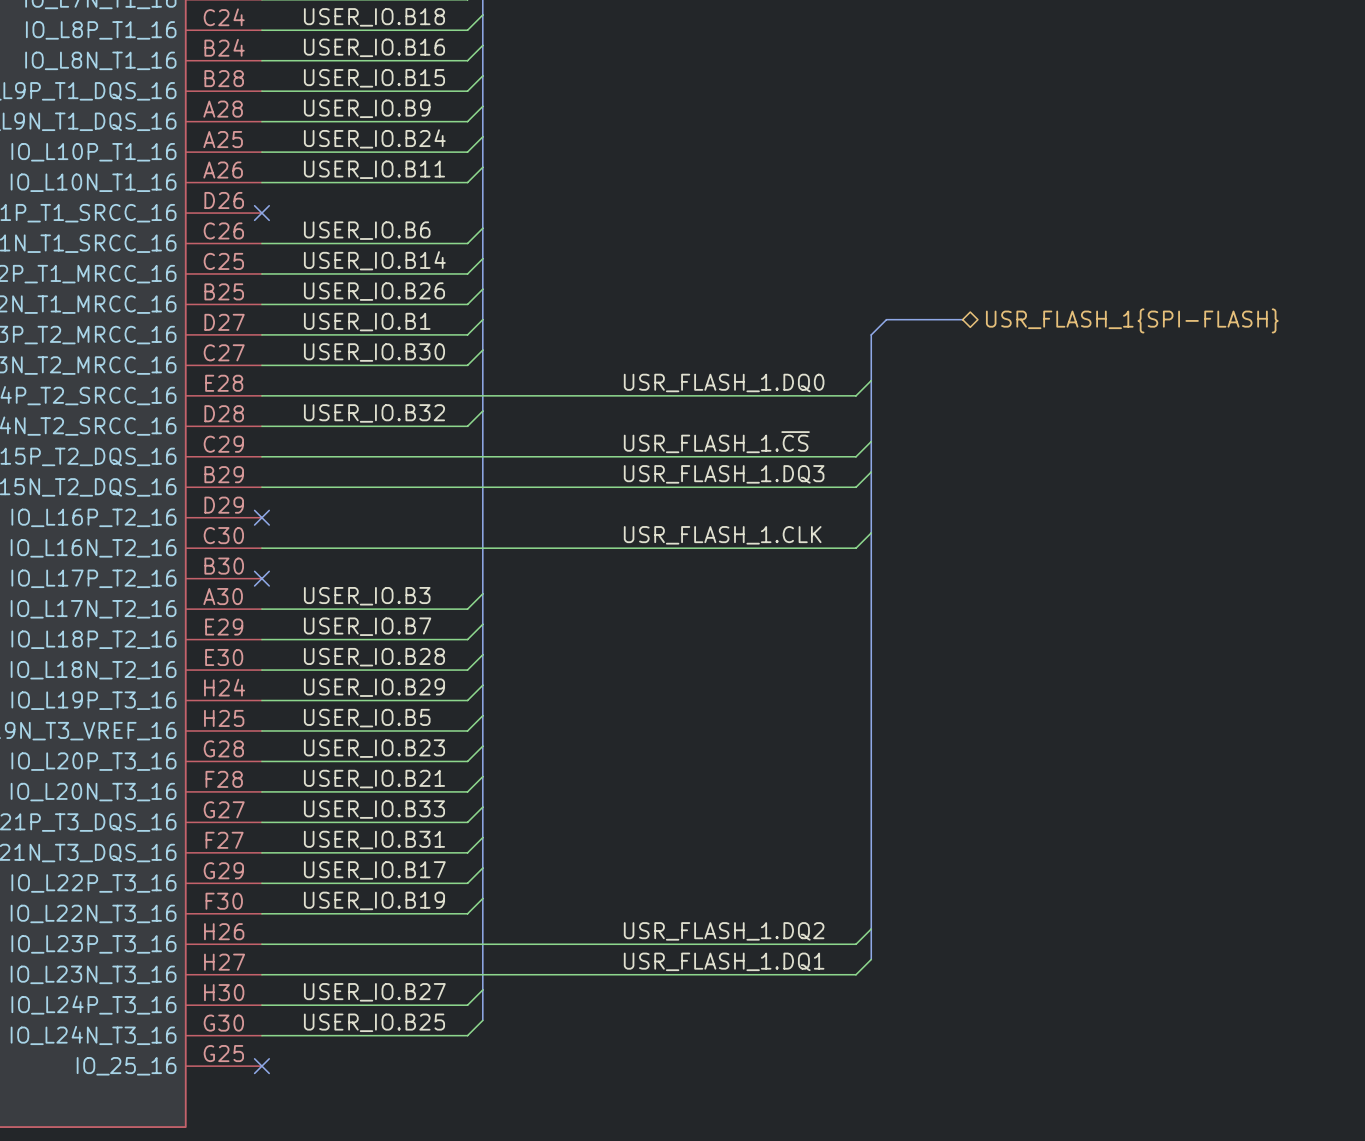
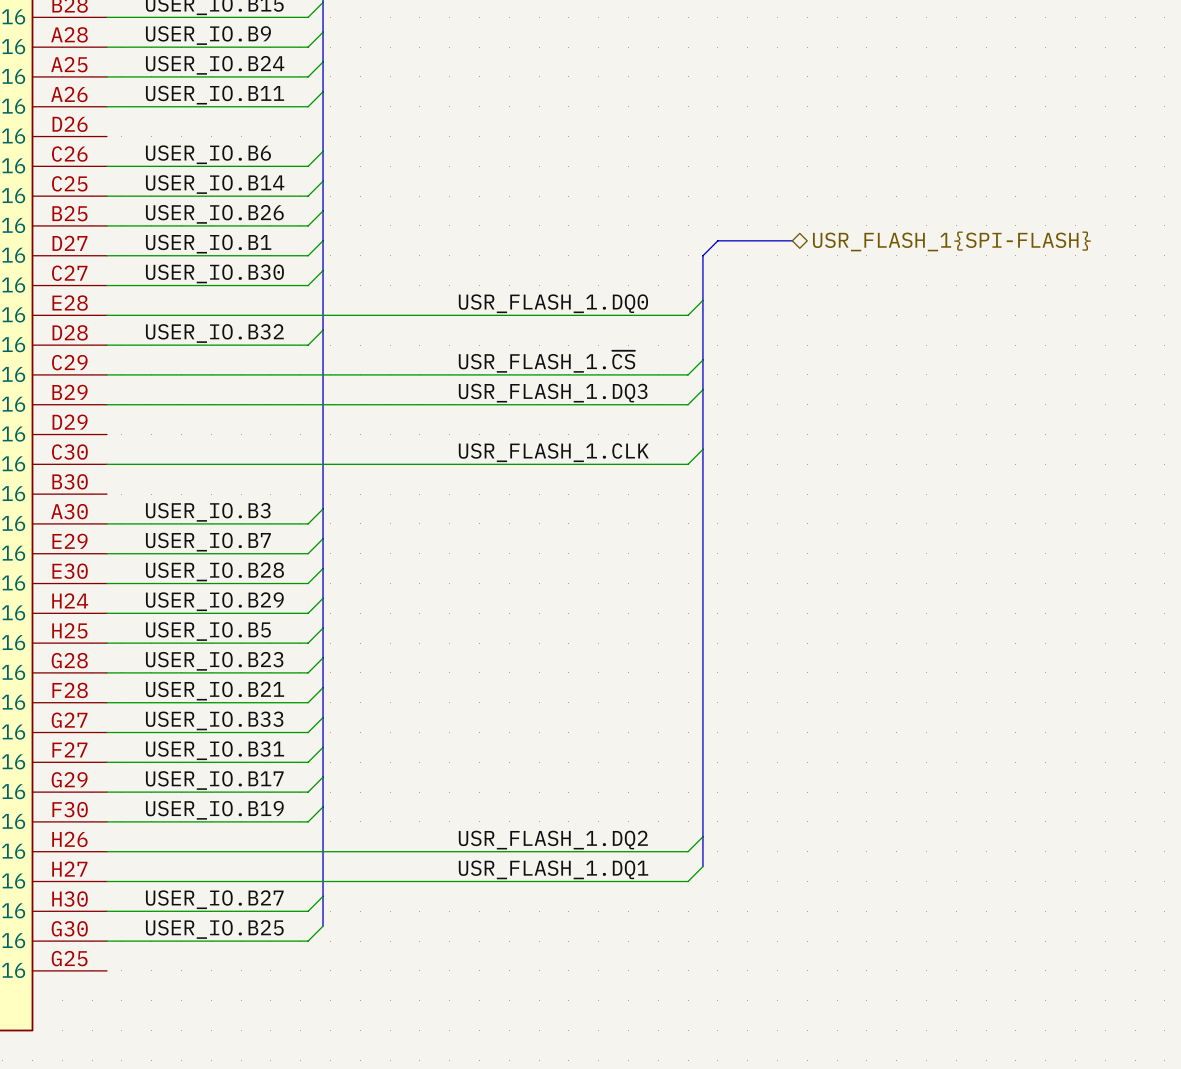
no-connect mark: (261, 213) -> none
no-connect mark: (261, 517) -> none
no-connect mark: (261, 578) -> none
no-connect mark: (261, 1066) -> none

